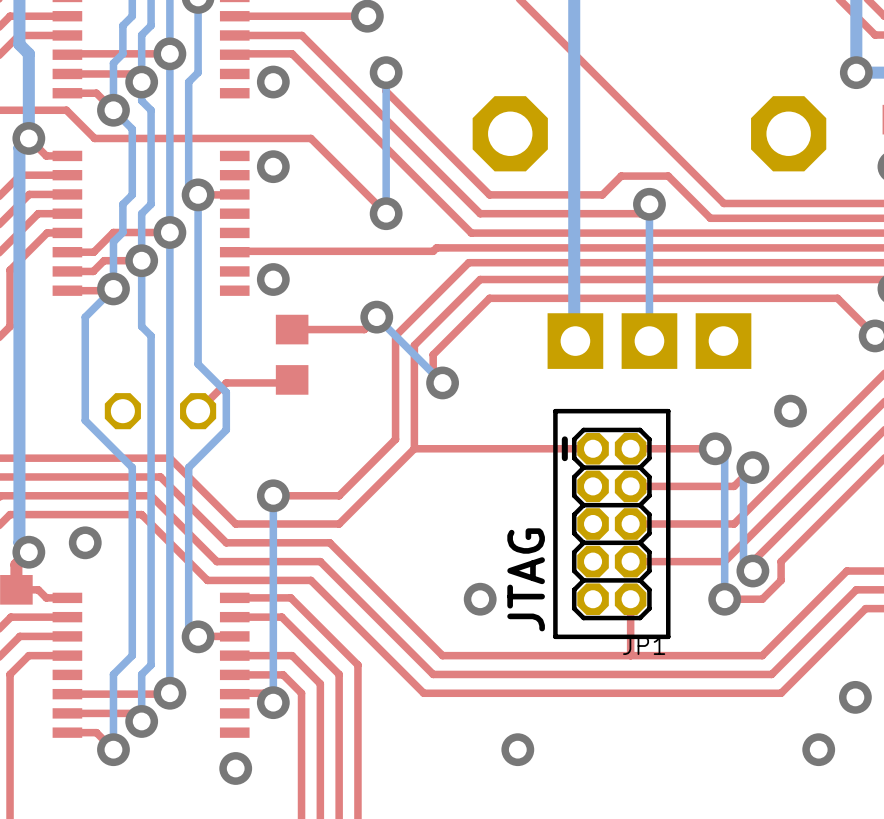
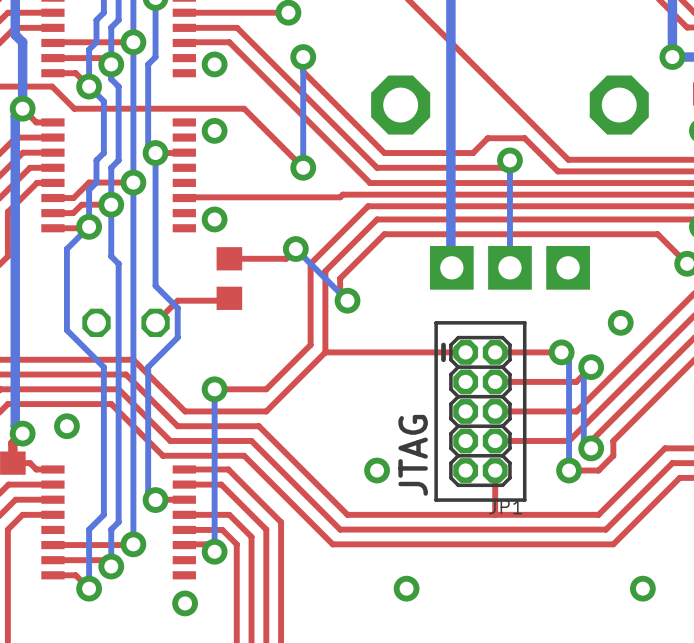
via: (855, 697) -> none

